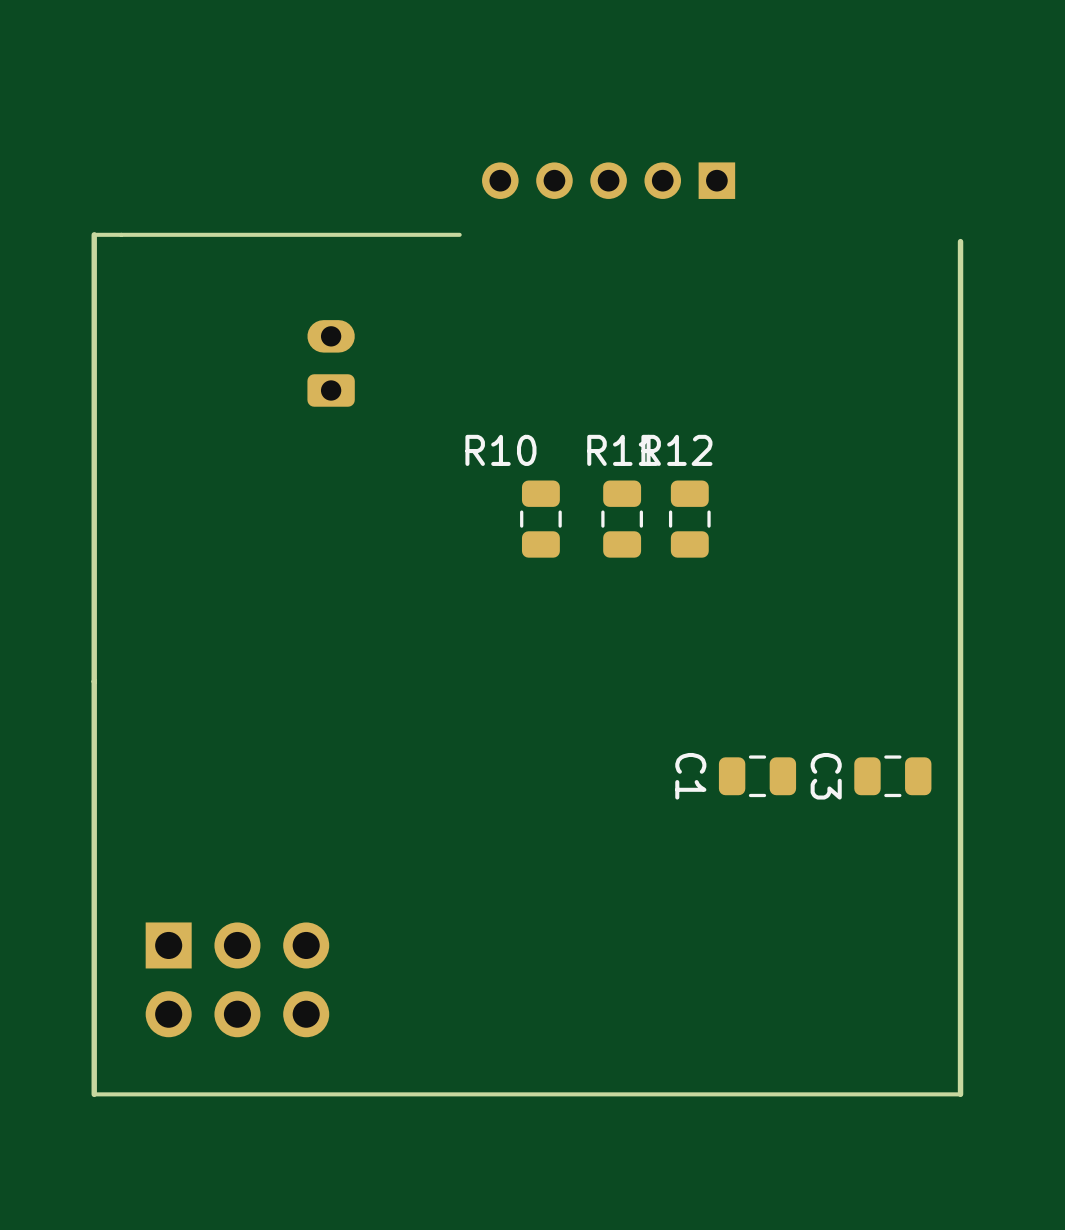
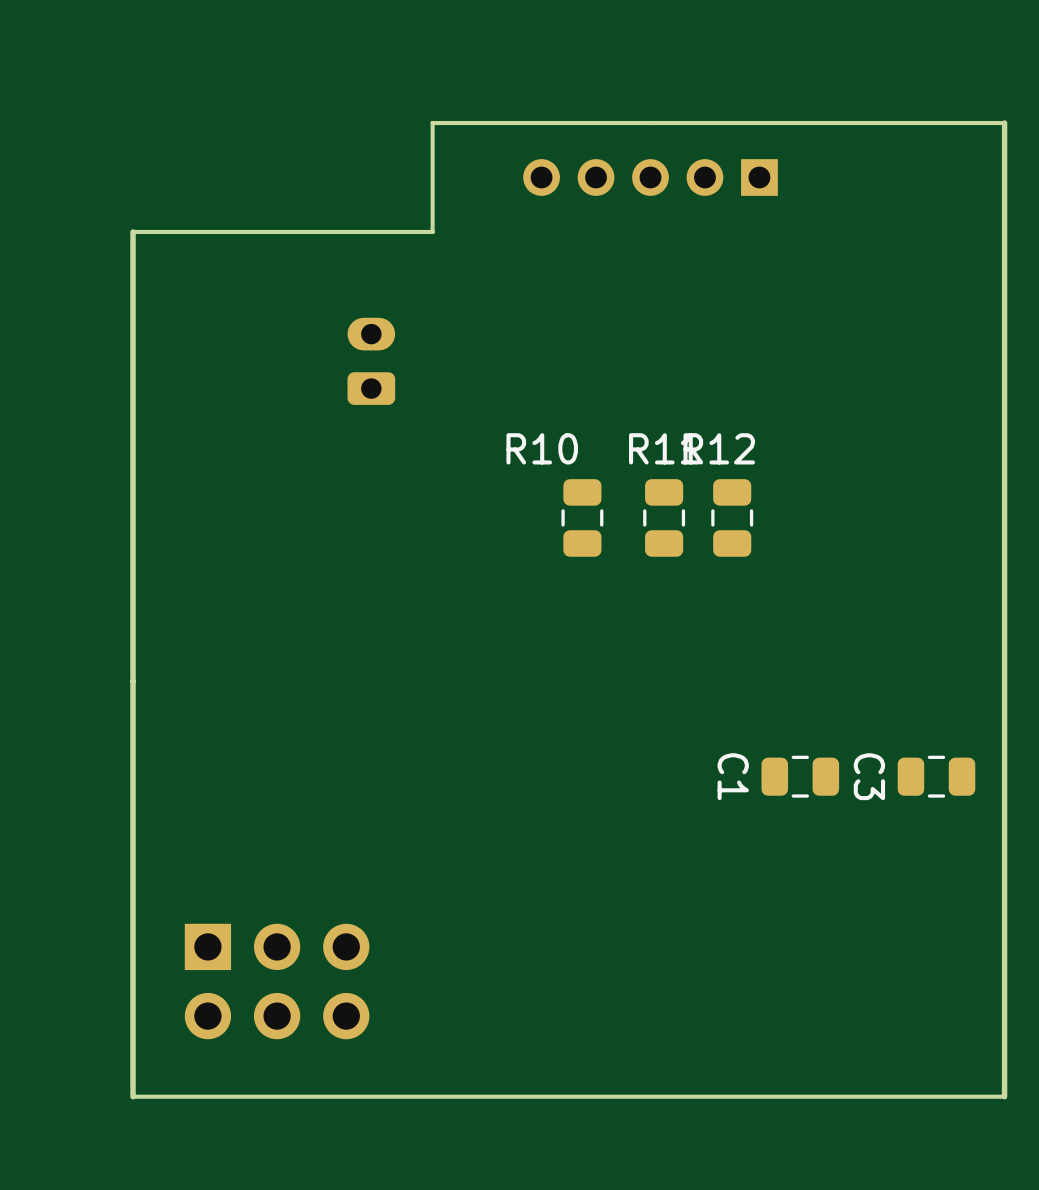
board edge: (459, 234) (392, 234) -> (1004, 238) (1004, 123) (432, 123) (432, 231)

